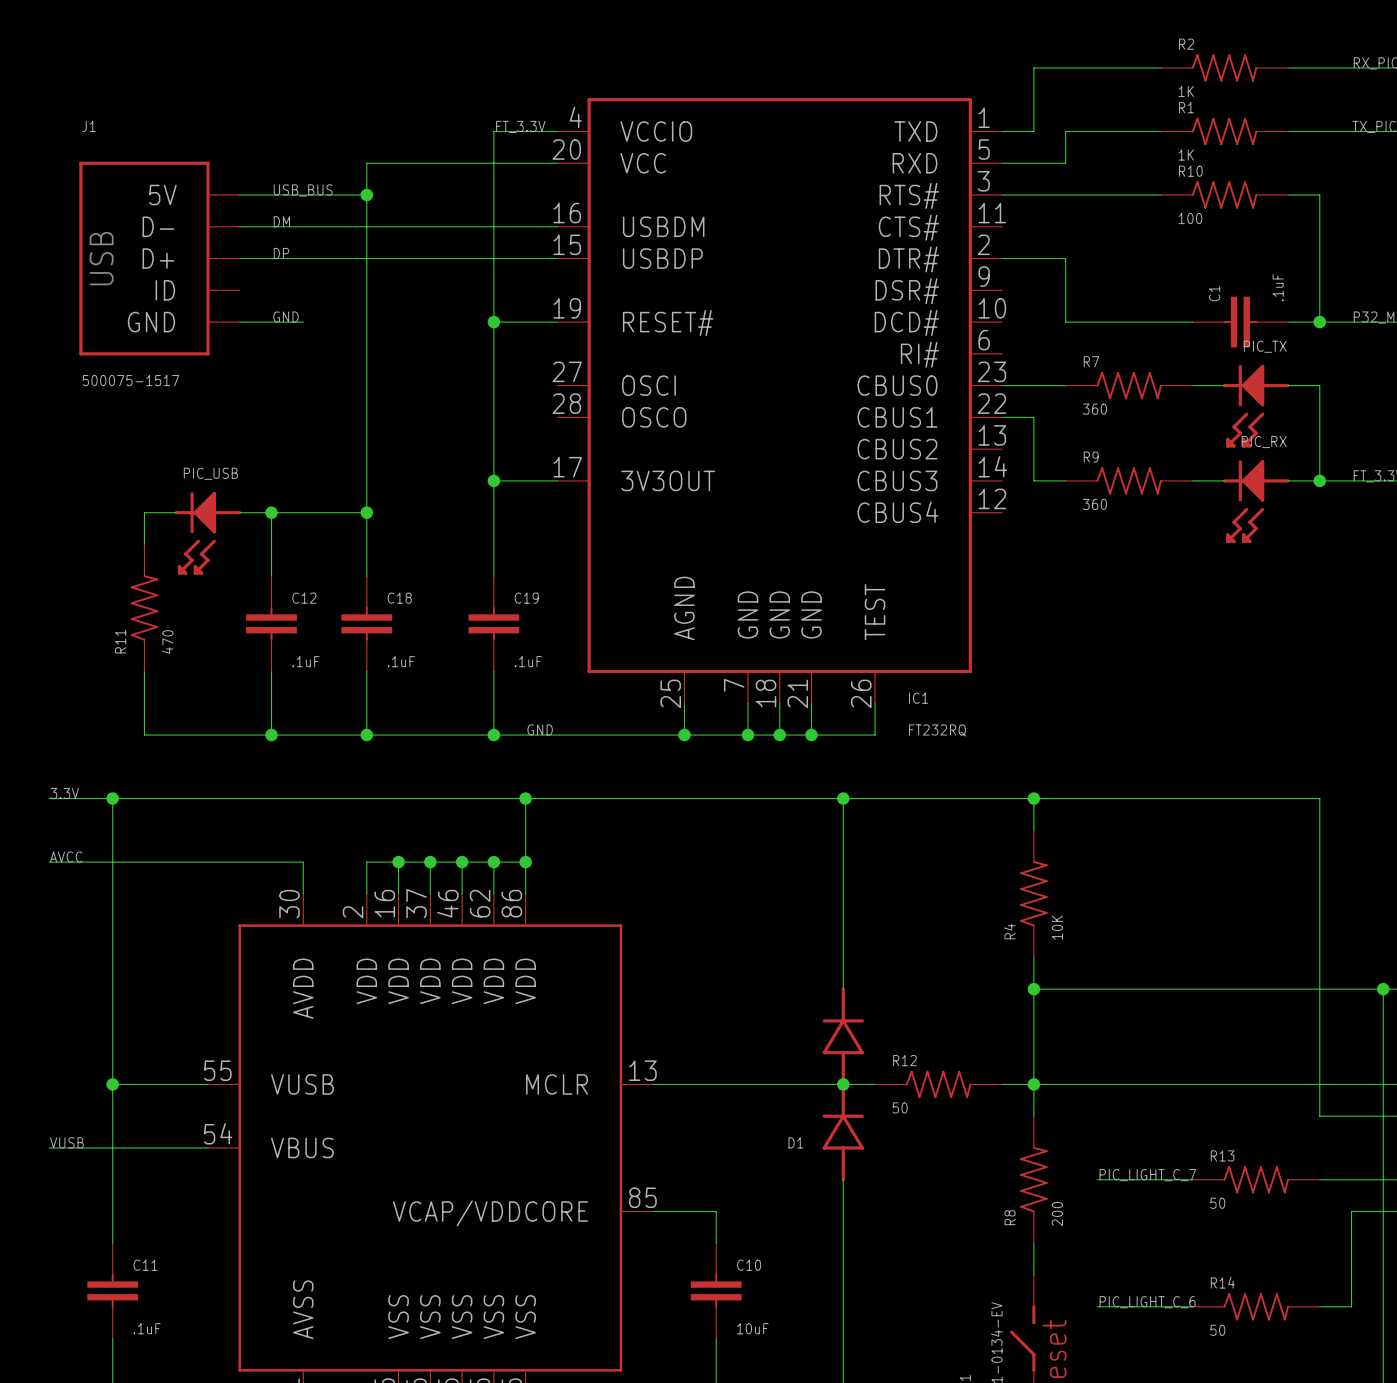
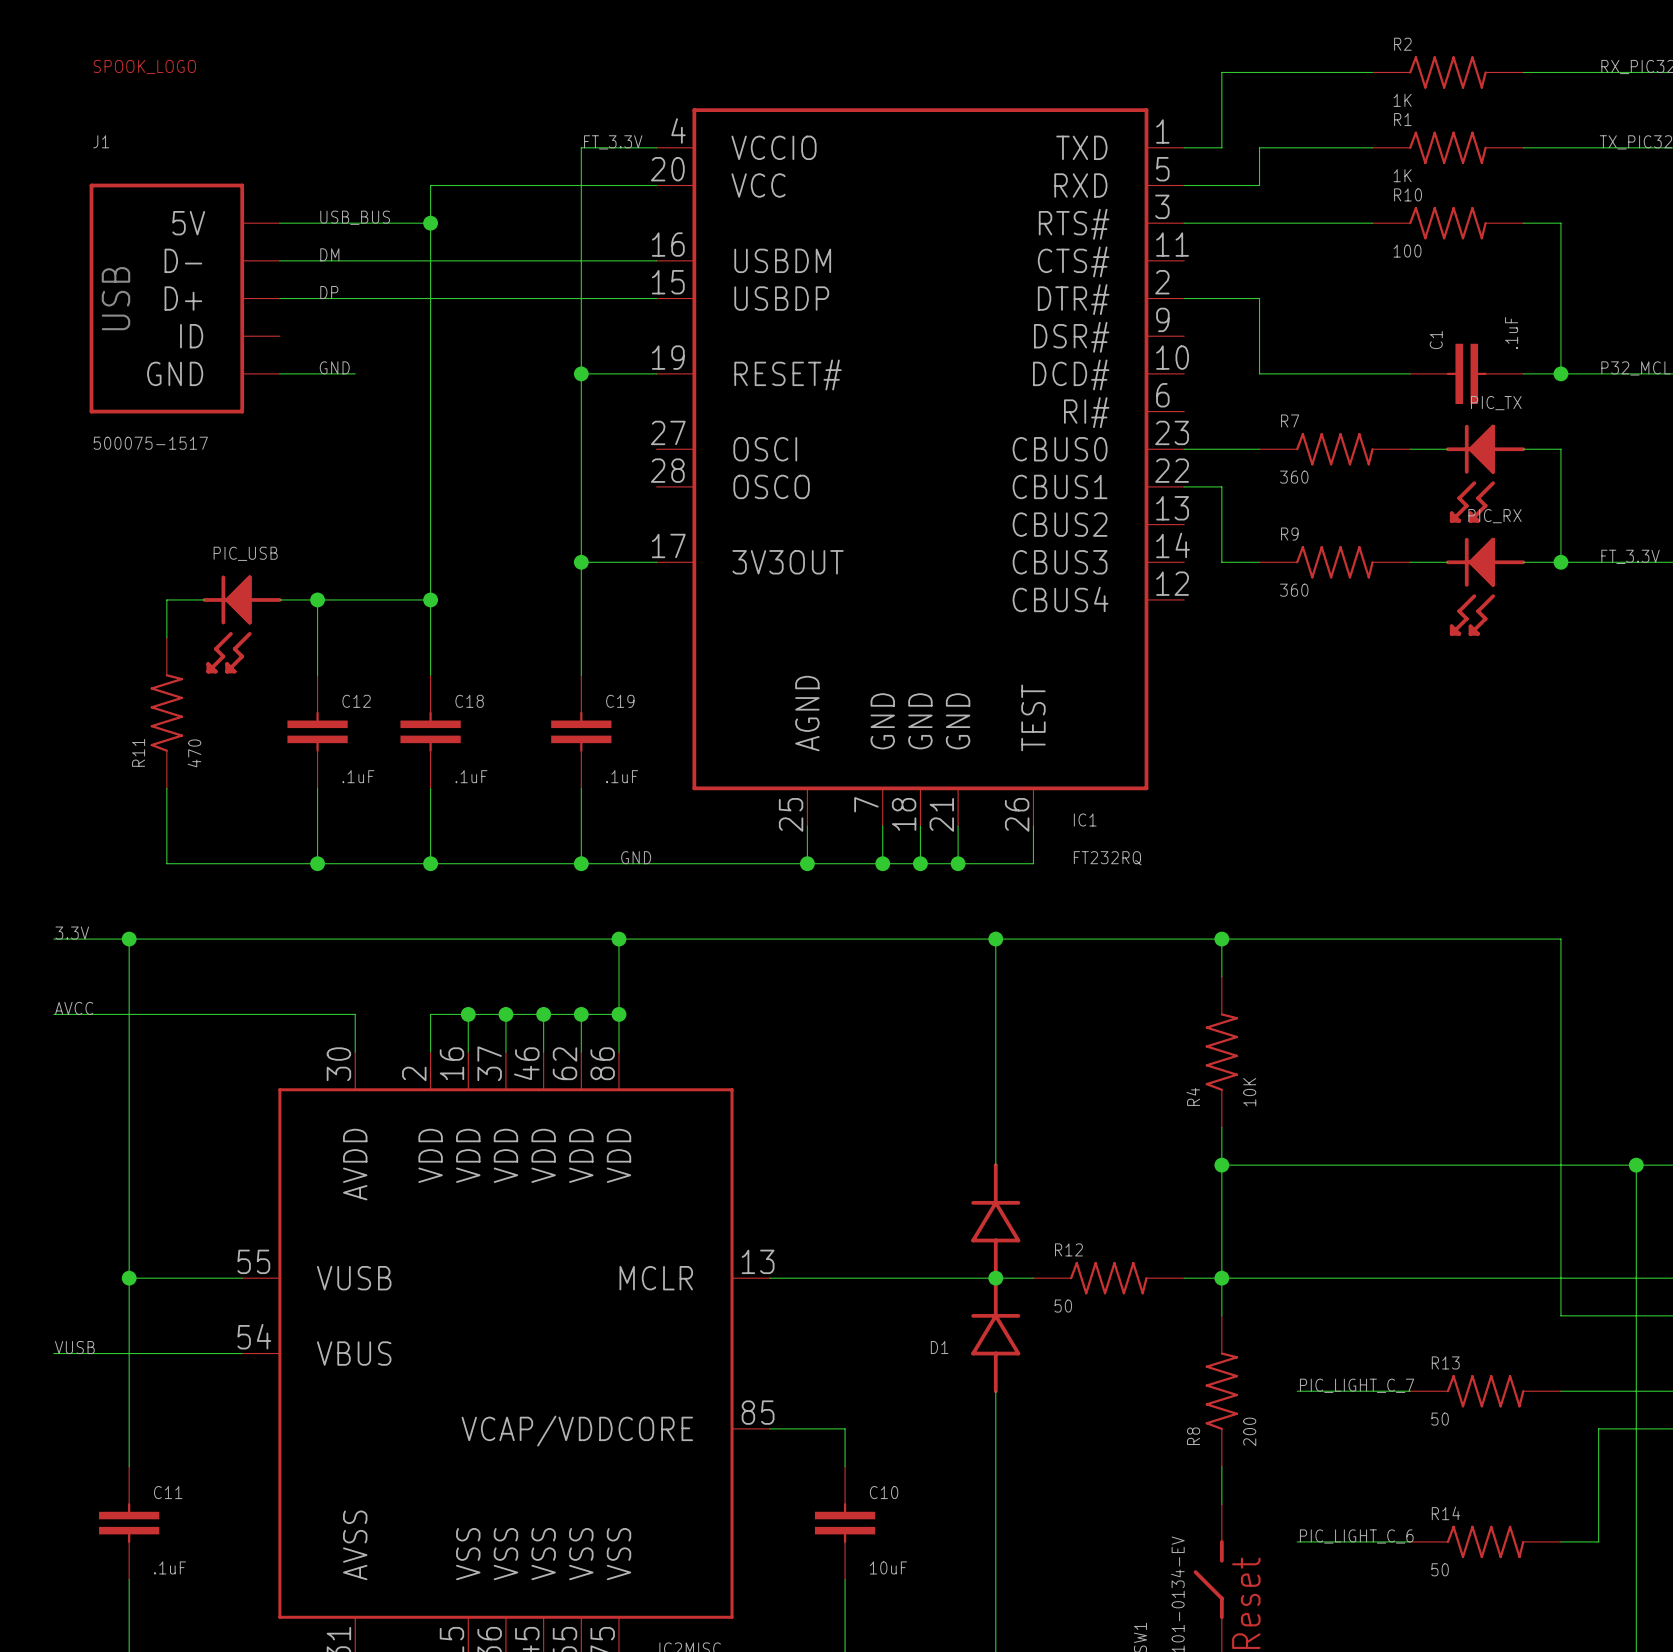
part: none -> (144, 67)

